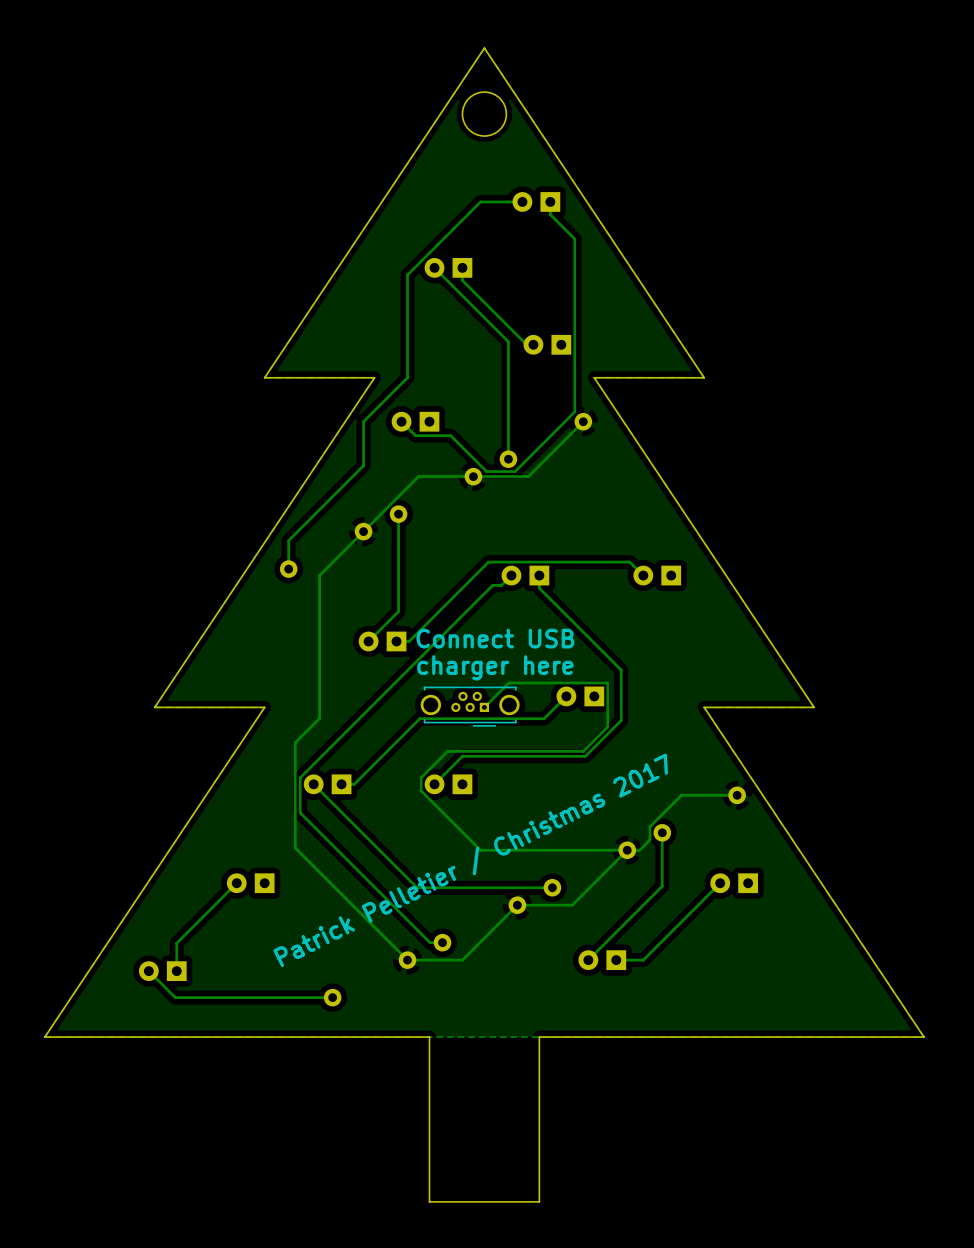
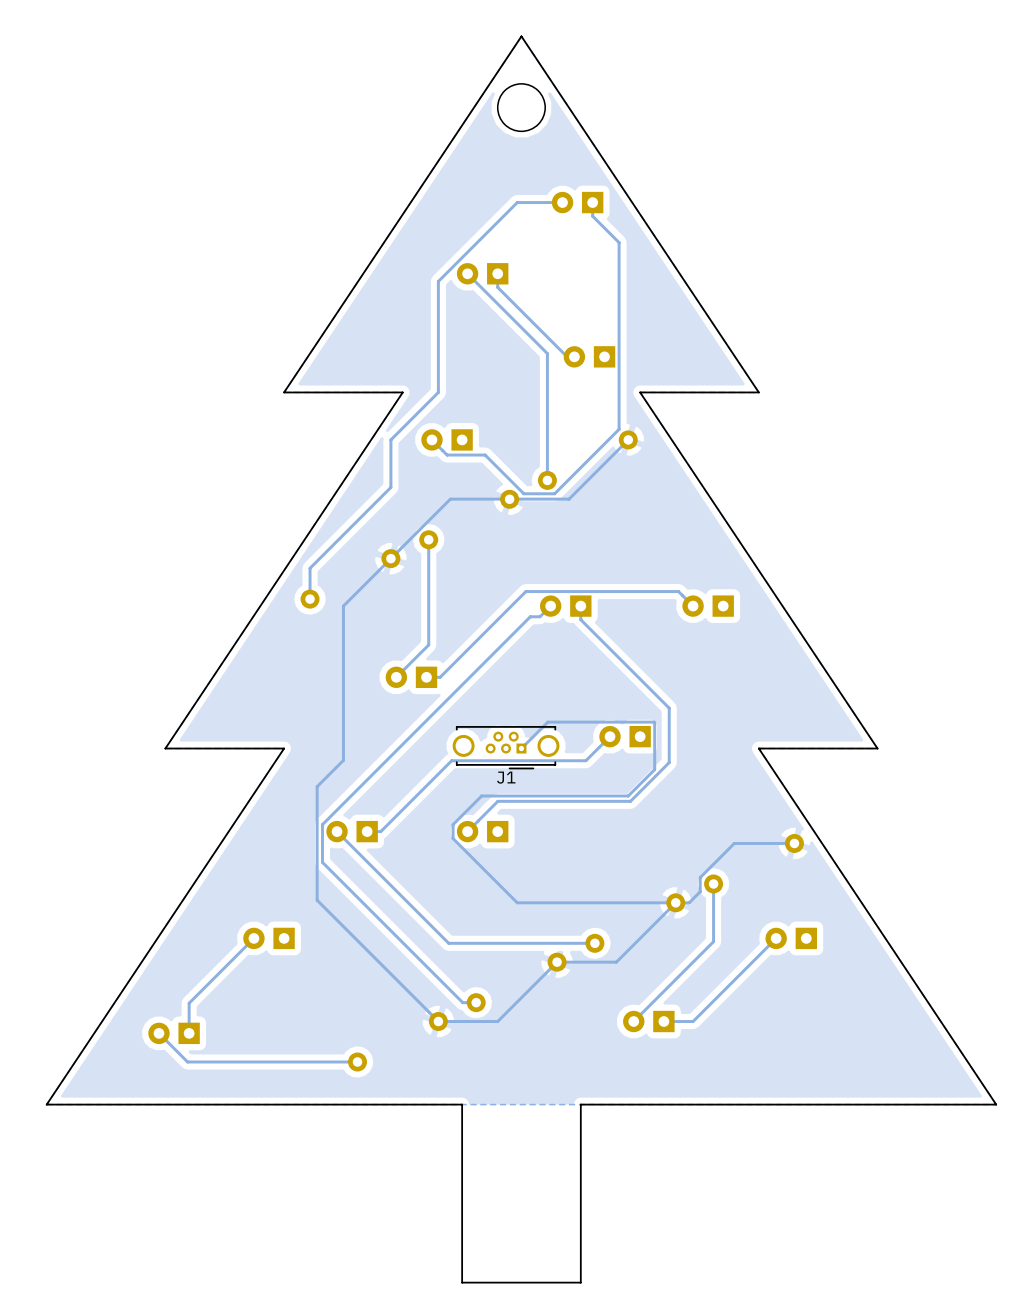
text: Connect USB (495, 638) -> none
text: charger here (495, 667) -> none
J1 name: none -> J1 (506, 777)
text: Patrick Pelletier / Christmas 2017 (470, 860) -> none

